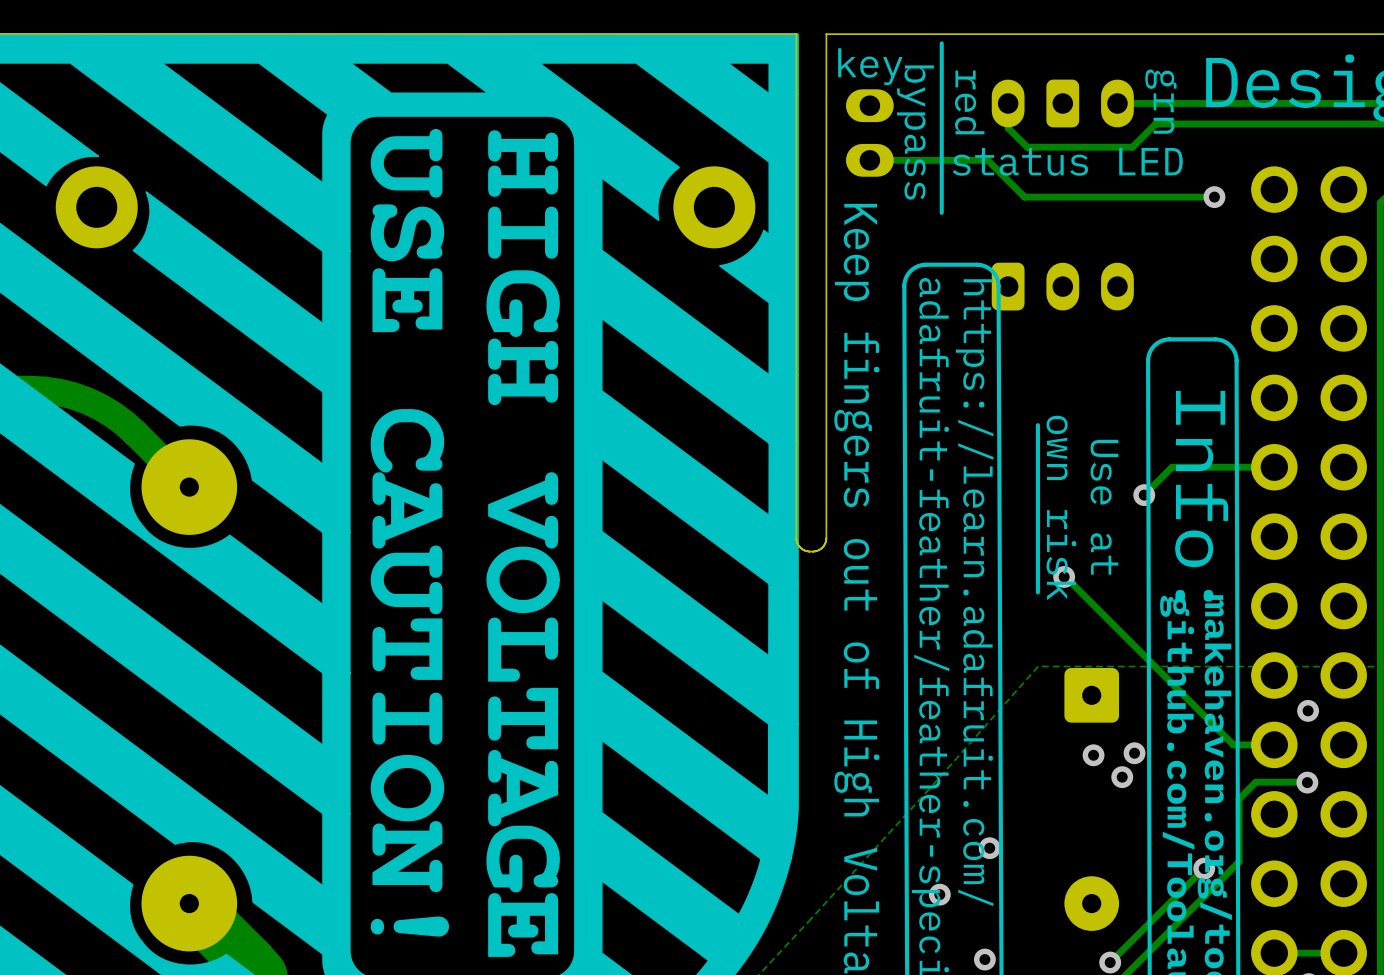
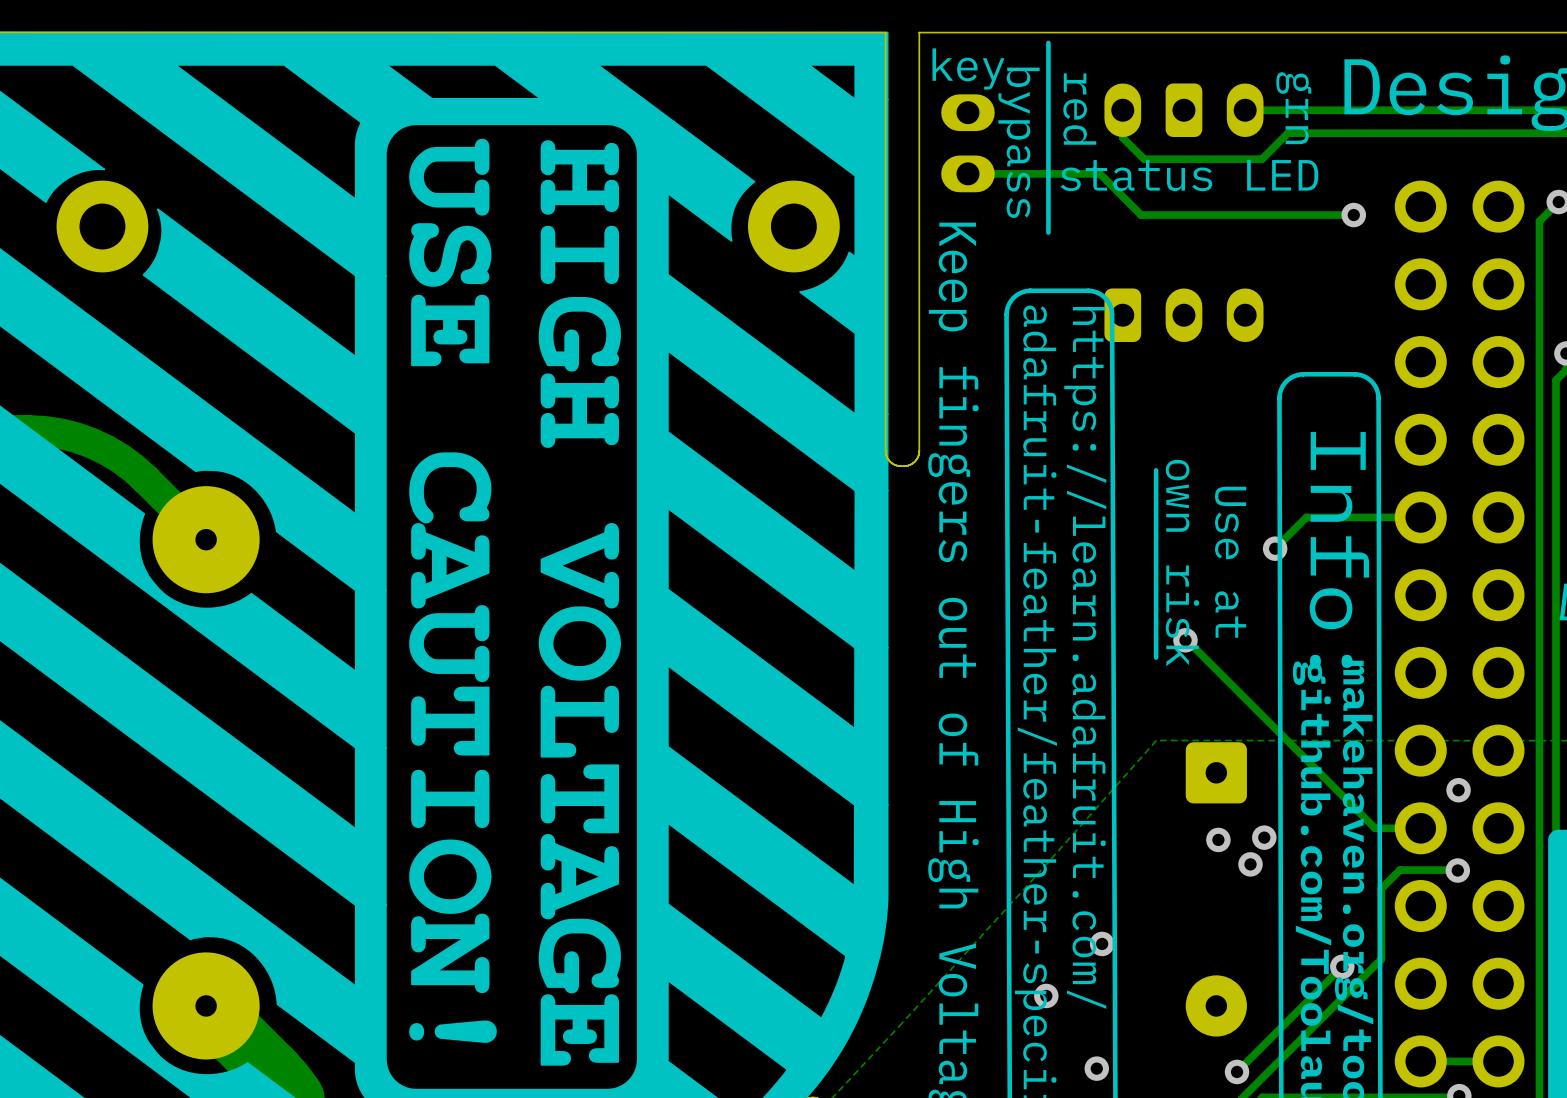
board edge: (826, 407) (826, 539) (821, 548) (812, 551) (801, 548) (796, 539) (796, 407) -> (919, 450) (914, 461) (904, 466) (891, 462) (885, 450)

